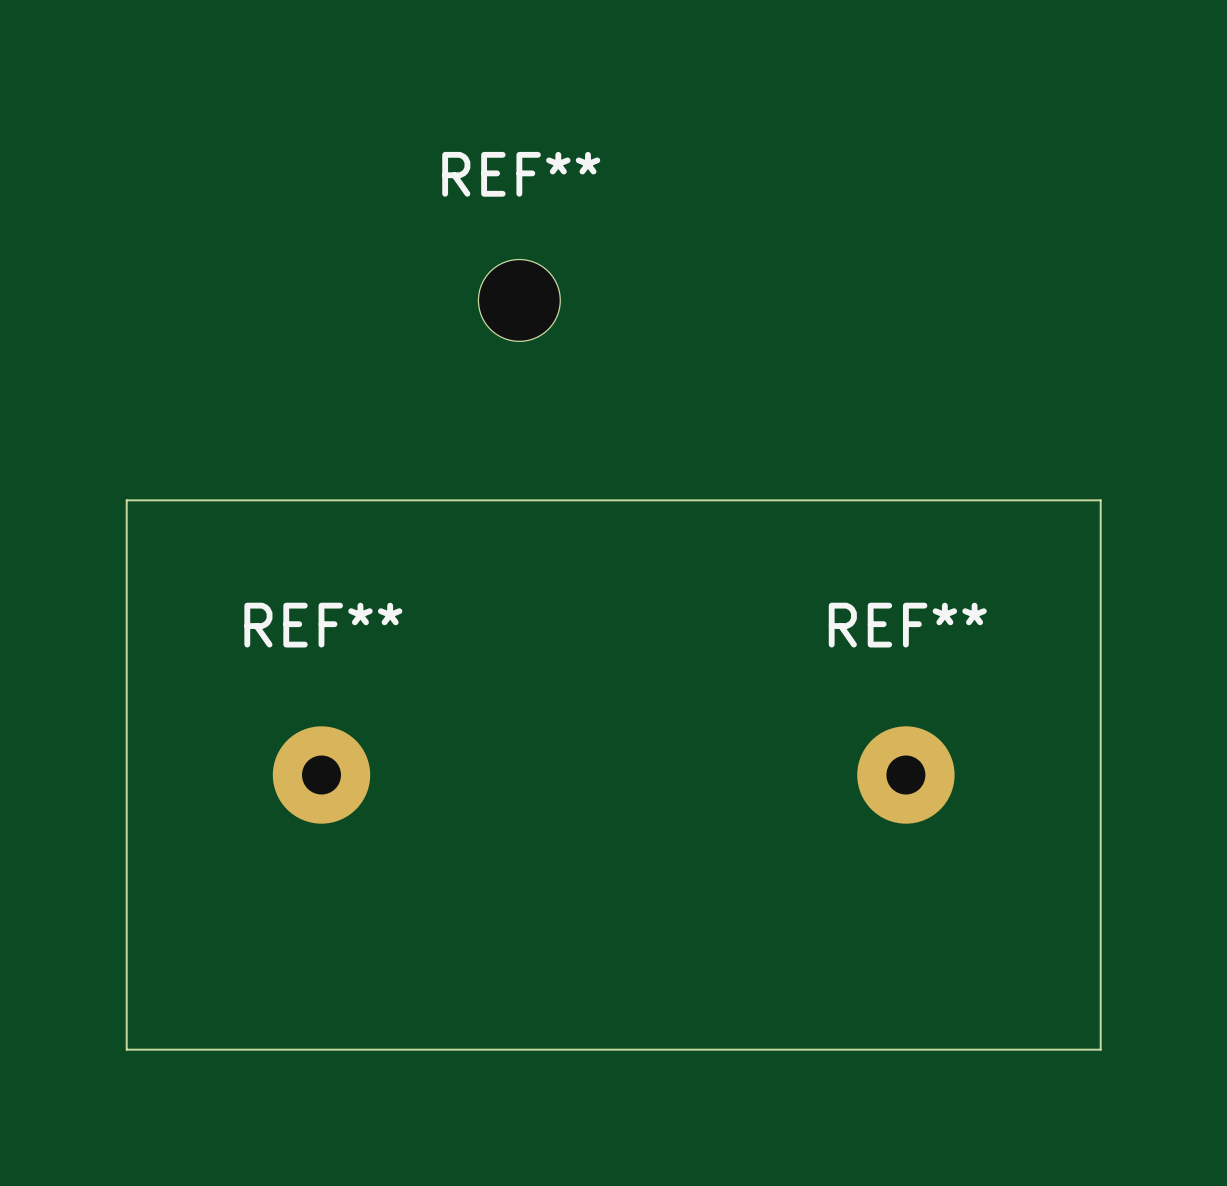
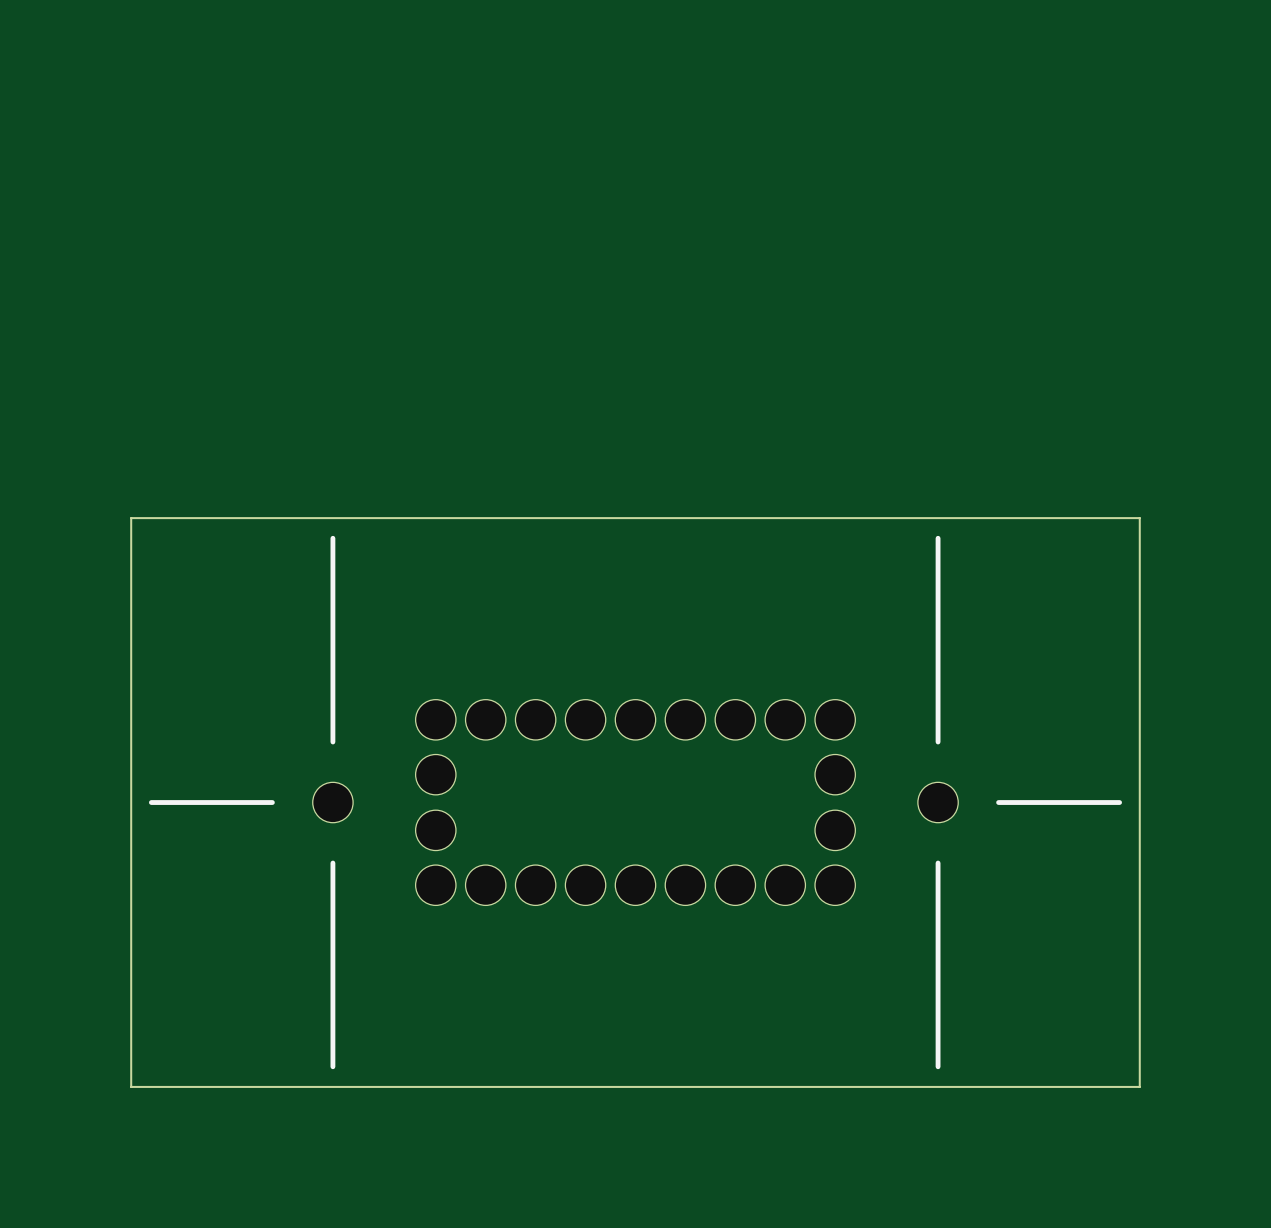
REF**: (519, 300) -> none
line: none -> (332, 538) (332, 742)
line: none -> (938, 538) (938, 742)
part: none -> (435, 719)
part: none -> (485, 719)
part: none -> (535, 719)
part: none -> (585, 719)
part: none -> (635, 719)
part: none -> (685, 719)
part: none -> (735, 719)
part: none -> (785, 719)
part: none -> (835, 719)
part: none -> (435, 774)
part: none -> (835, 774)
line: none -> (151, 802) (272, 802)
REF**: (321, 775) -> none
part: none -> (332, 802)
REF**: (905, 775) -> none
part: none -> (938, 802)
line: none -> (998, 802) (1119, 802)
part: none -> (435, 830)
part: none -> (835, 830)
line: none -> (332, 863) (332, 1066)
line: none -> (938, 863) (938, 1066)
part: none -> (435, 885)
part: none -> (485, 885)
part: none -> (535, 885)
part: none -> (585, 885)
part: none -> (635, 885)
part: none -> (685, 885)
part: none -> (735, 885)
part: none -> (785, 885)
part: none -> (835, 885)

